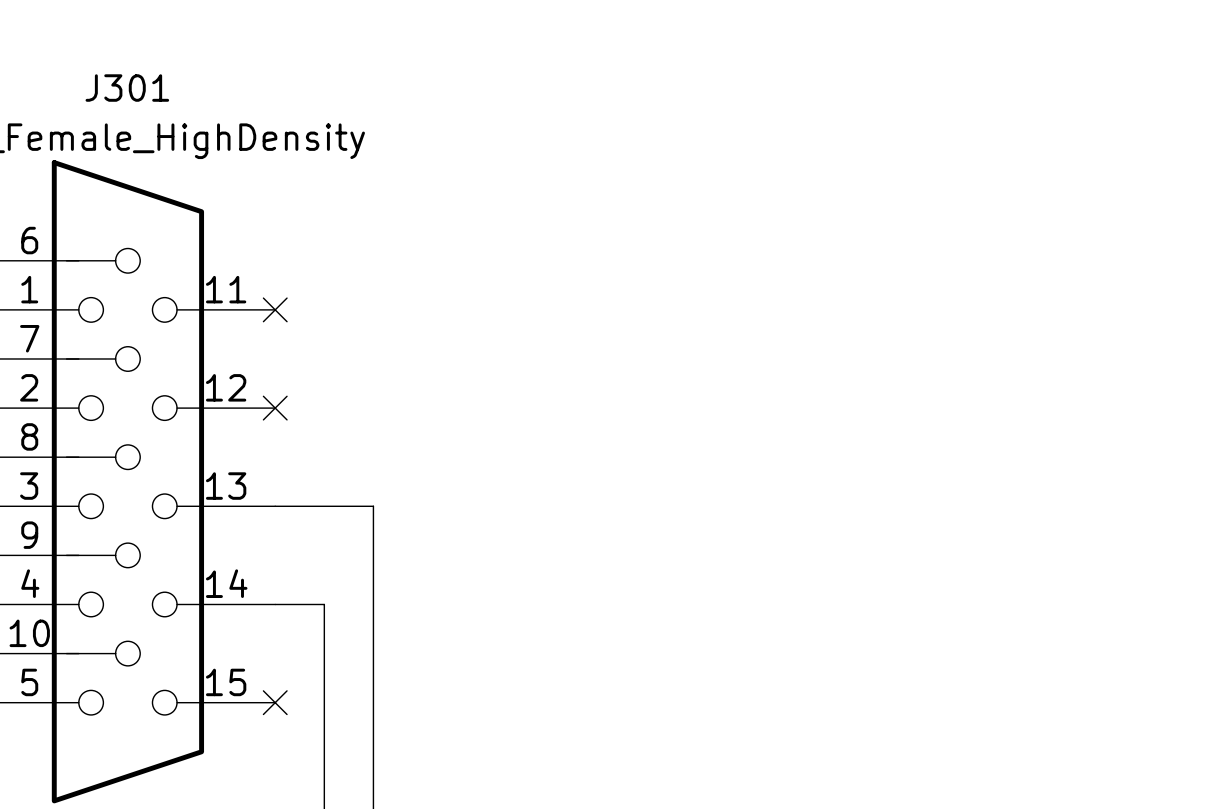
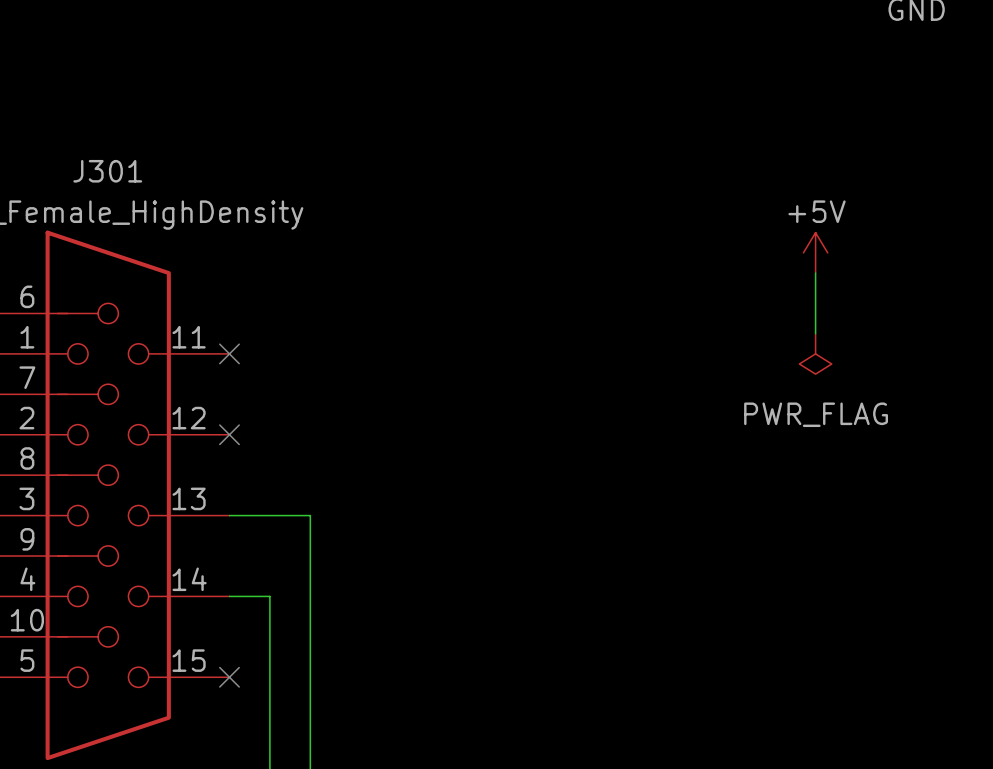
power symbol: none -> +5V (815, 252)
wire: none -> (815, 273) (815, 333)
power symbol: none -> PWR_FLAG (815, 353)

